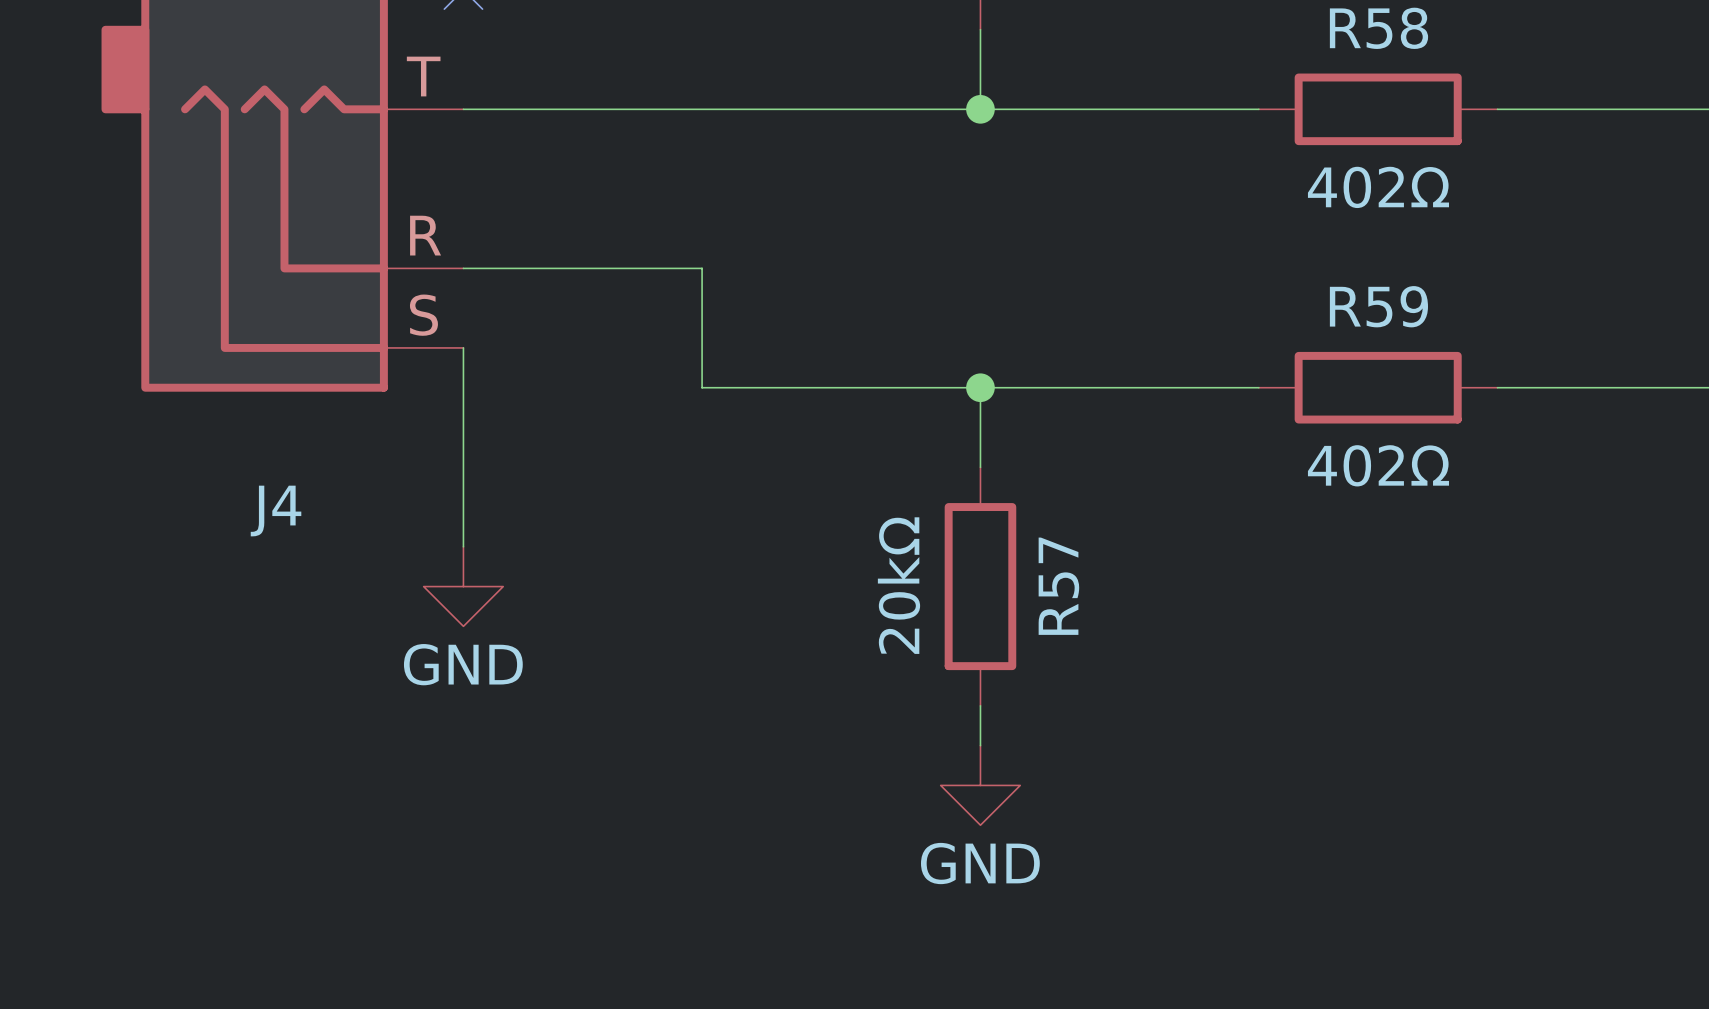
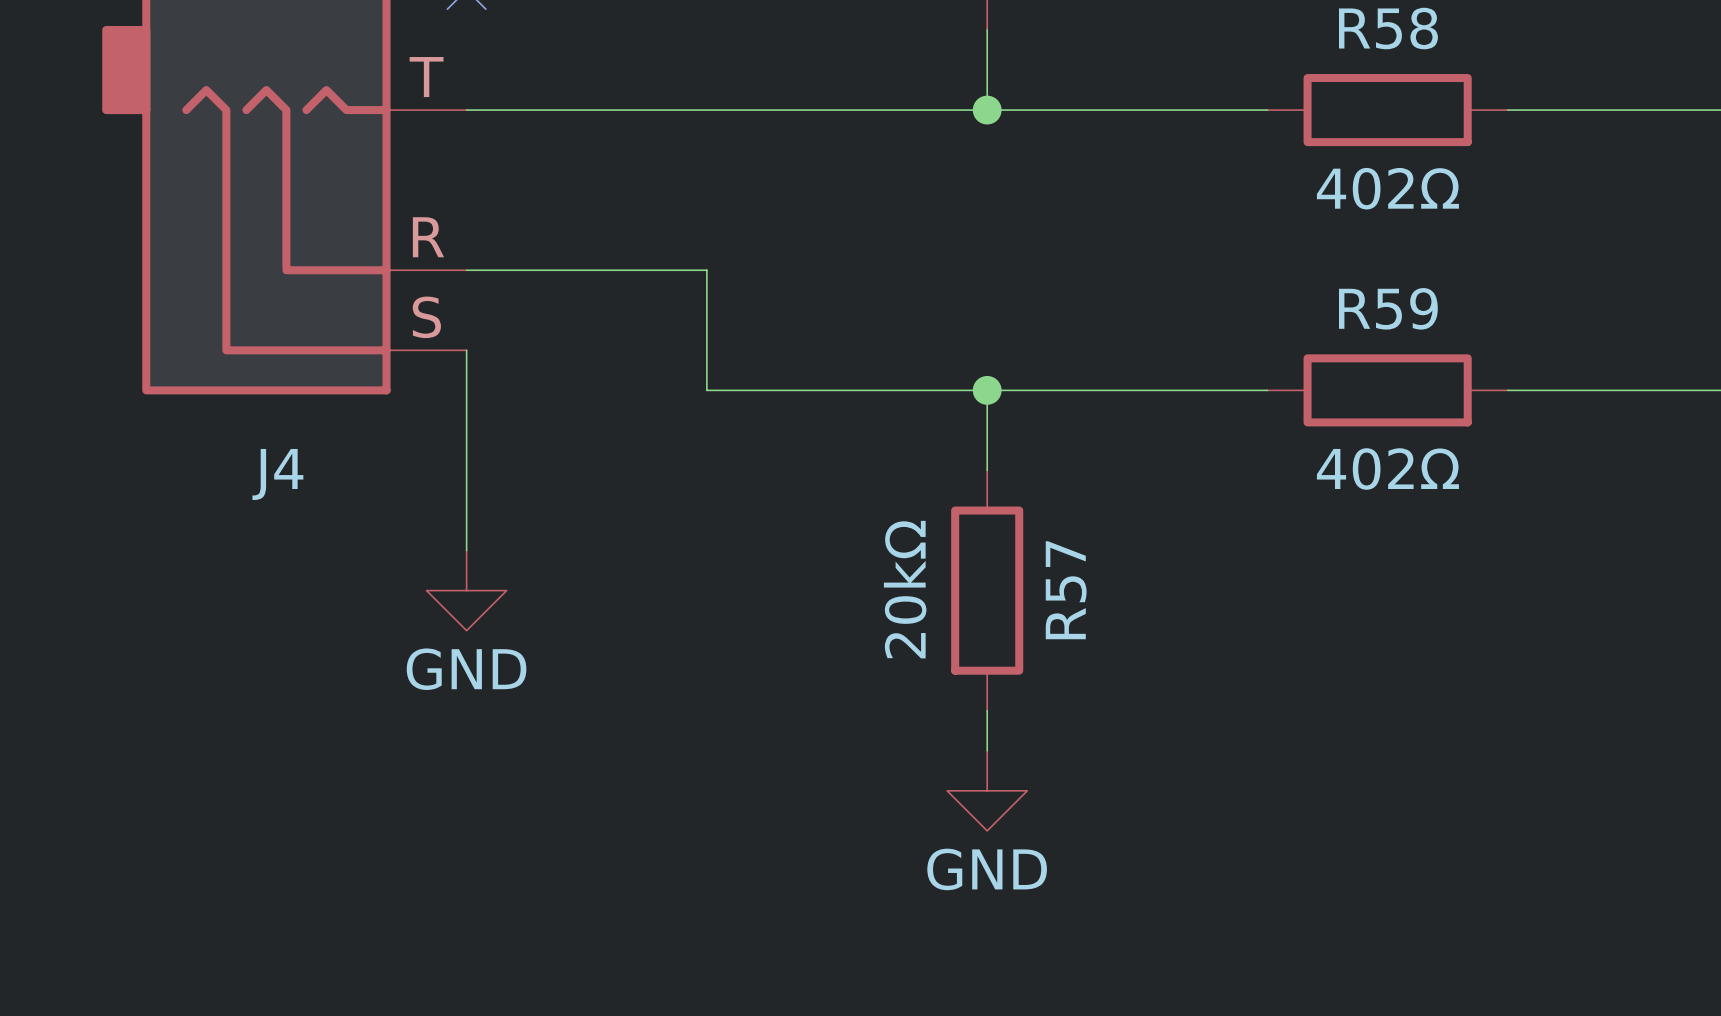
J4 name position: J4 (276, 511) -> J4 (277, 474)

